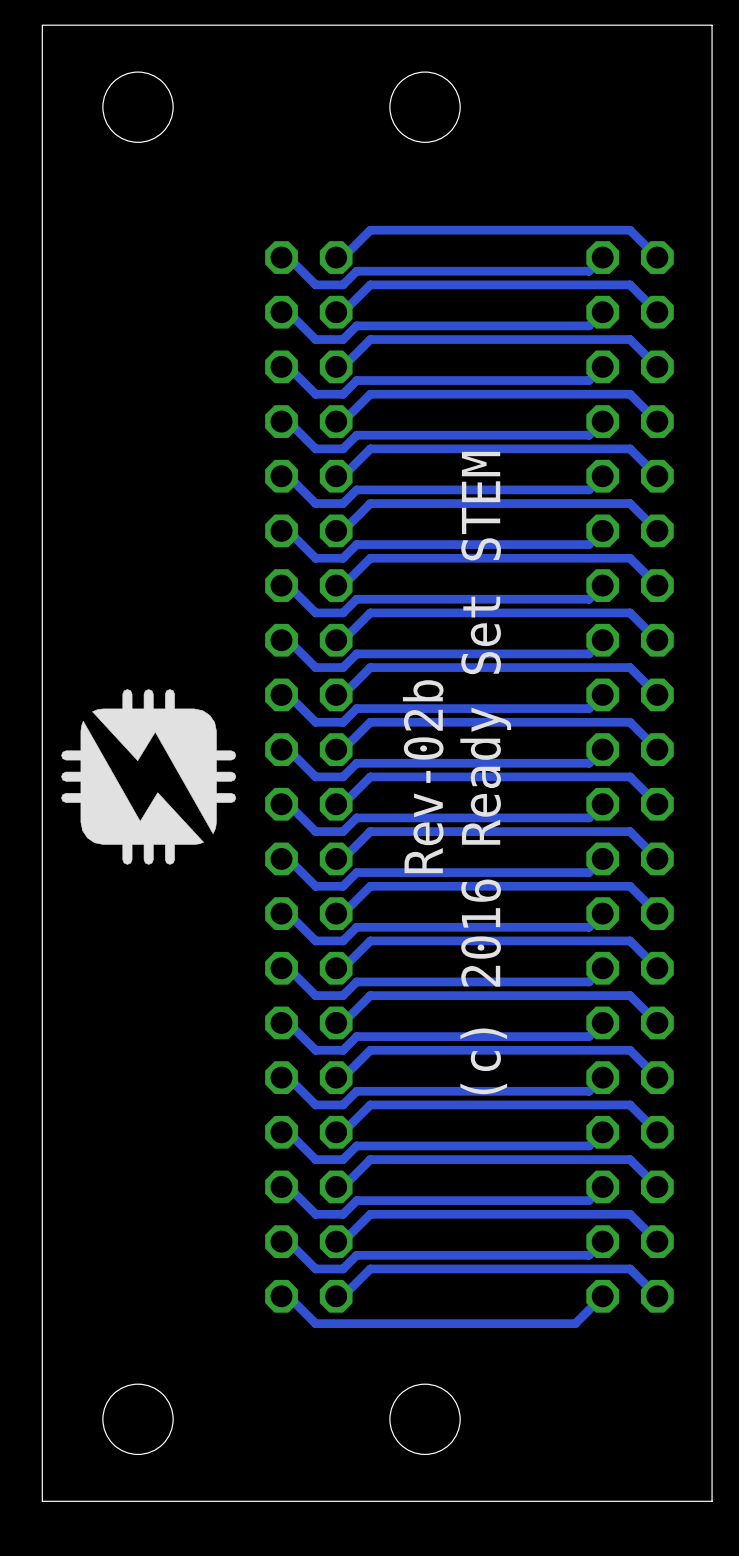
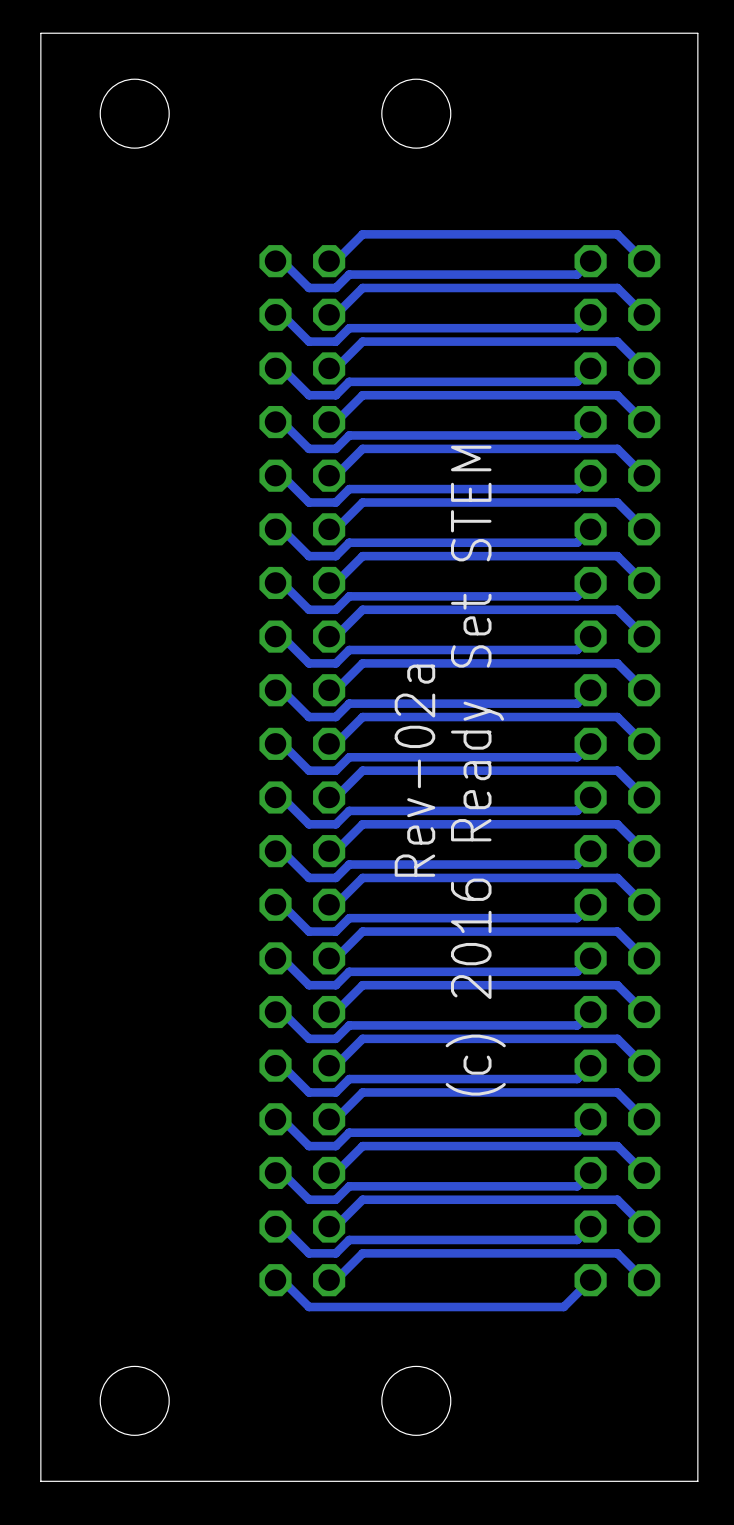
drawing: [61, 689, 237, 865] -> none
text: Rev-02b (423, 776) -> Rev-02a (414, 770)

